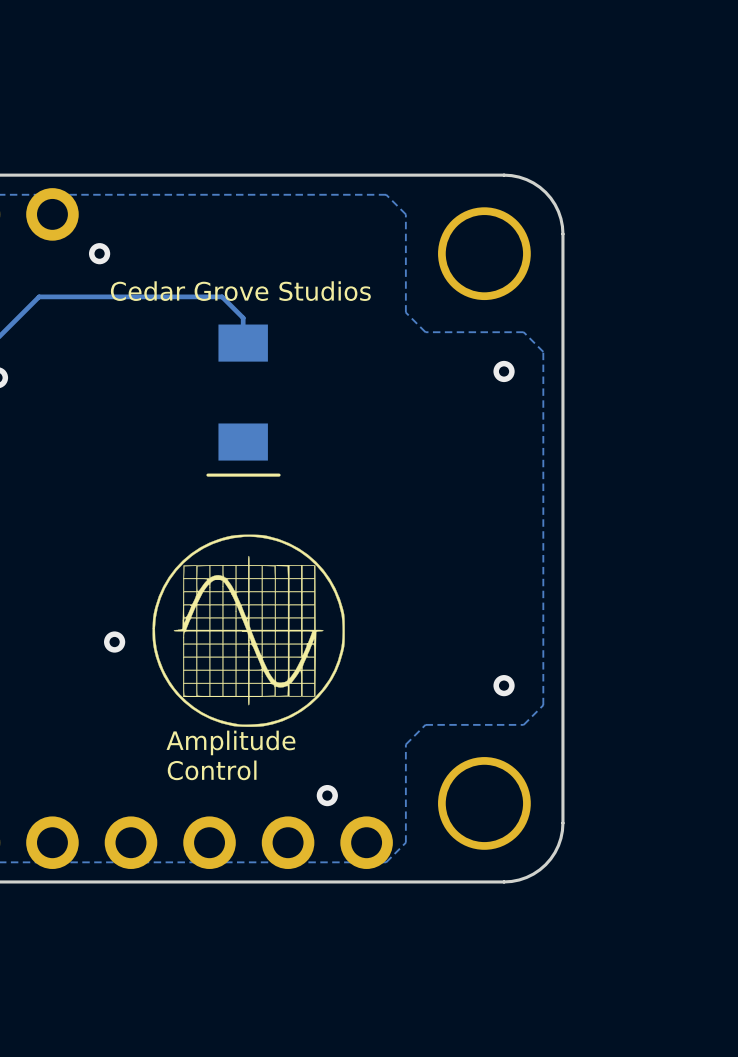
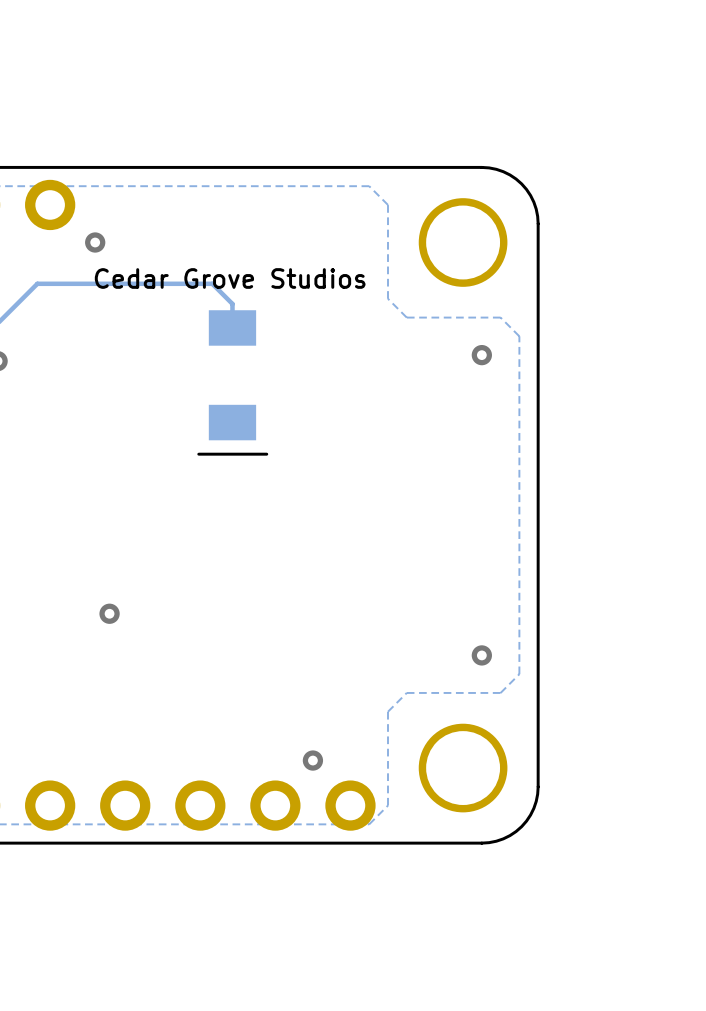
drawing: [152, 534, 345, 727] -> none
text: Amplitude (230, 742) -> none
text: Control (212, 770) -> none

